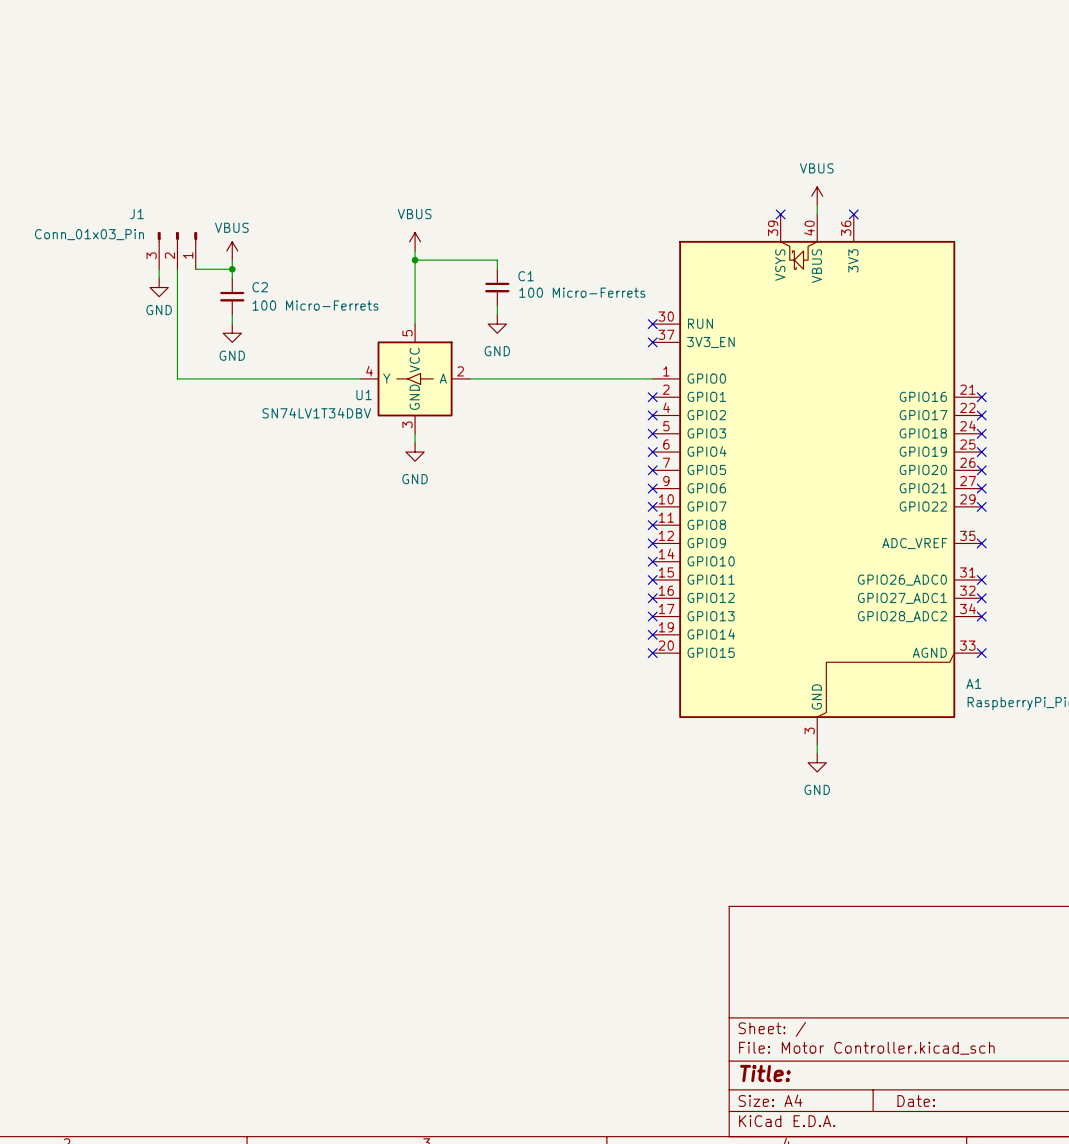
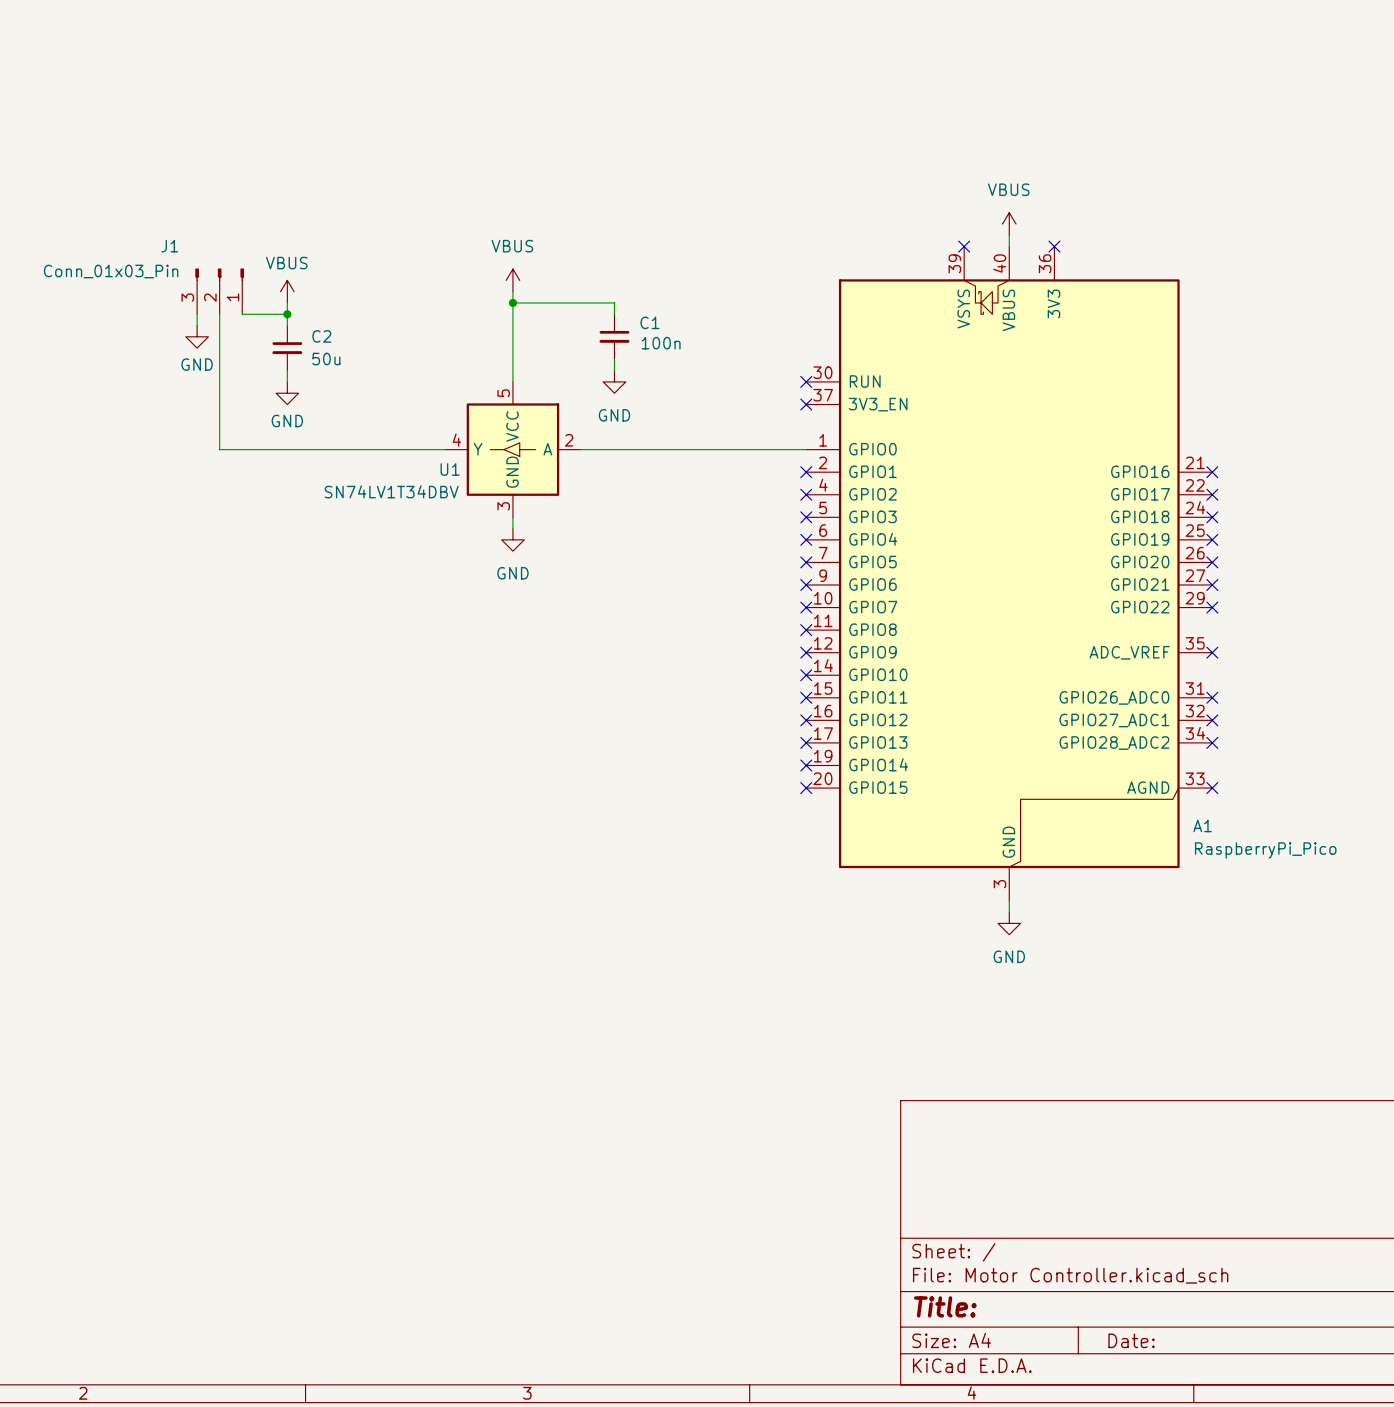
C1 value: 100 Micro-Ferrets (582, 292) -> 100n (661, 343)
C2 value: 100 Micro-Ferrets (315, 305) -> 50u (326, 359)

